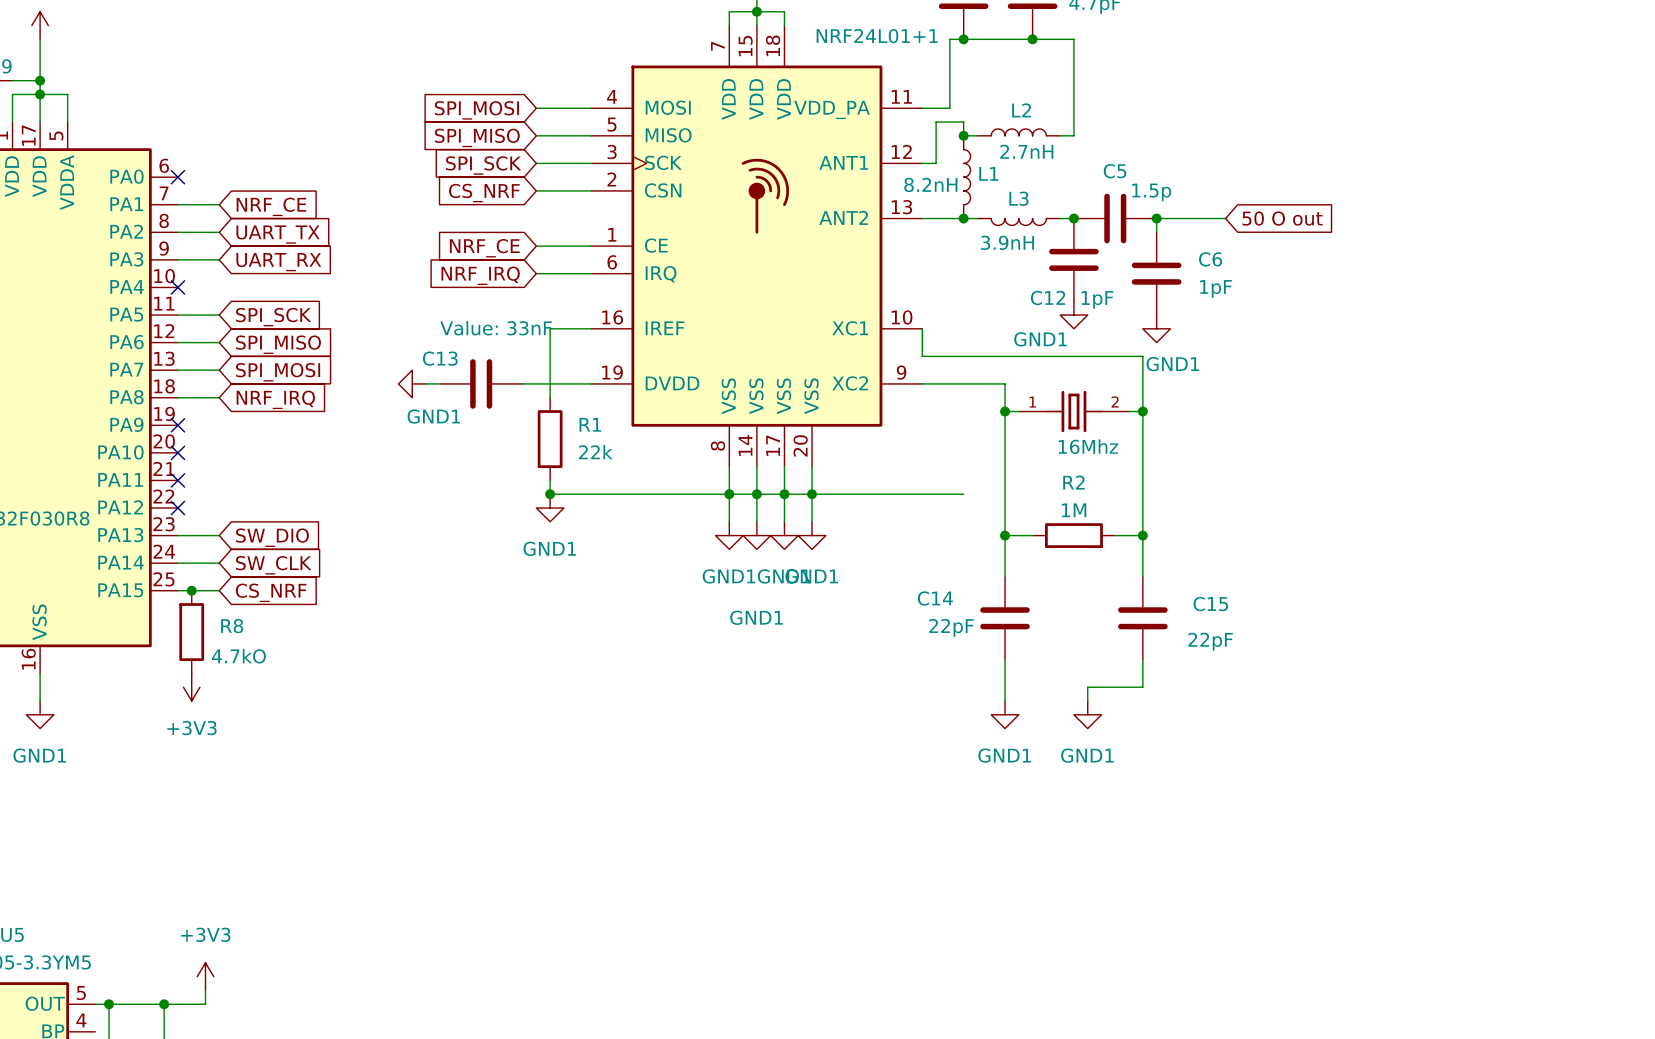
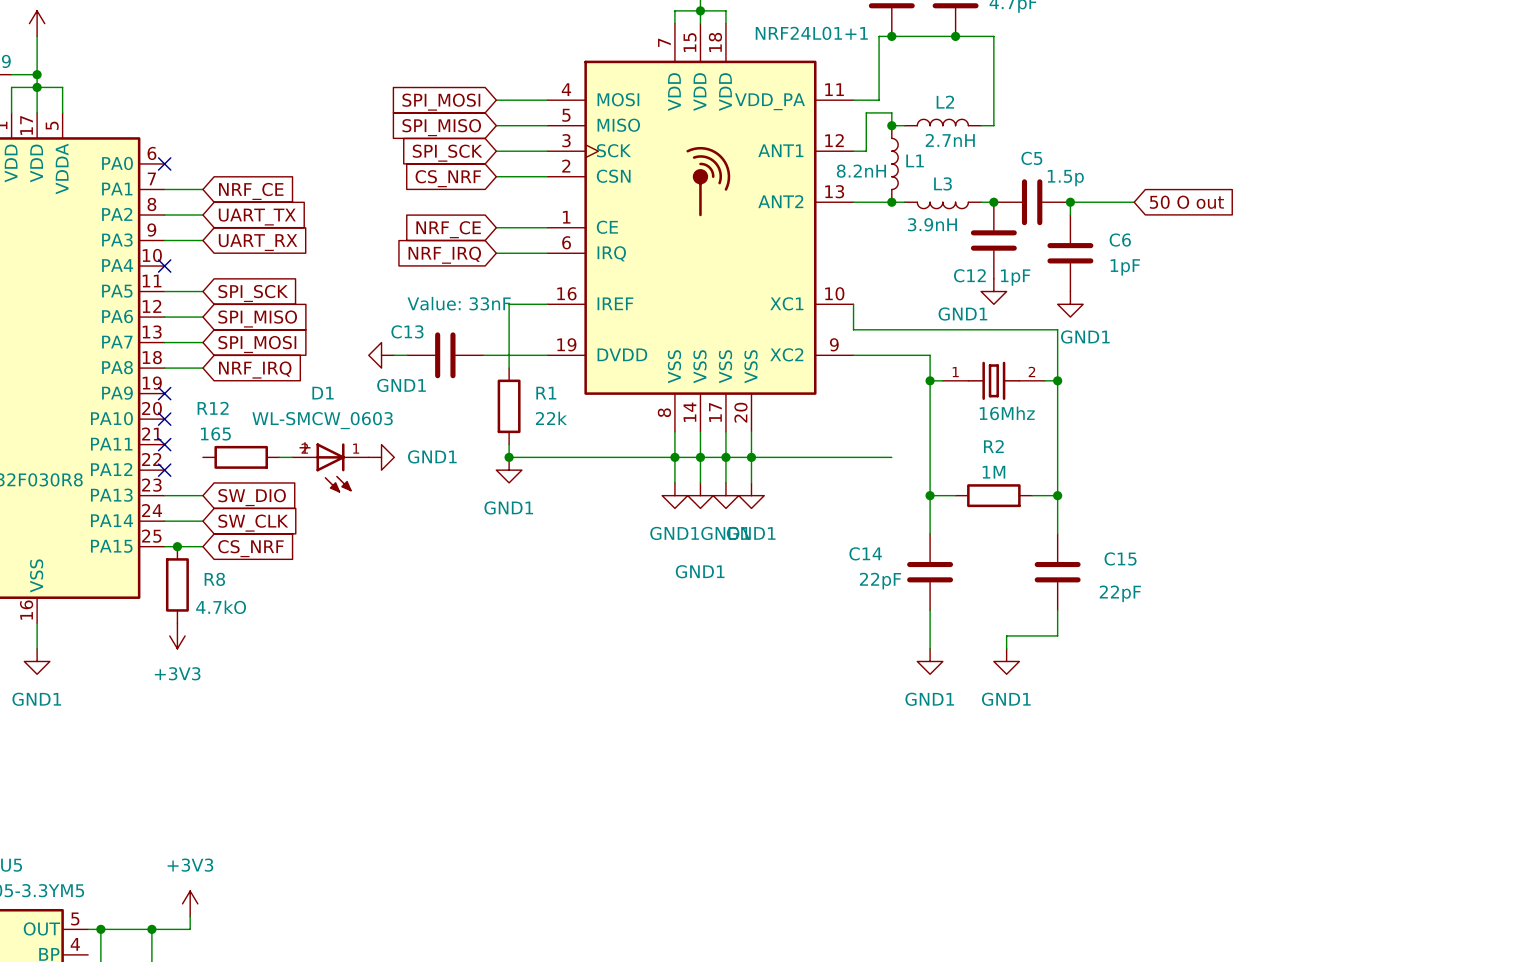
R12: none -> 165 (241, 457)
wire: none -> (279, 457) (292, 457)
power symbol: none -> GND1 (381, 457)
D1: none -> WL-SMCW_0603 (330, 467)

